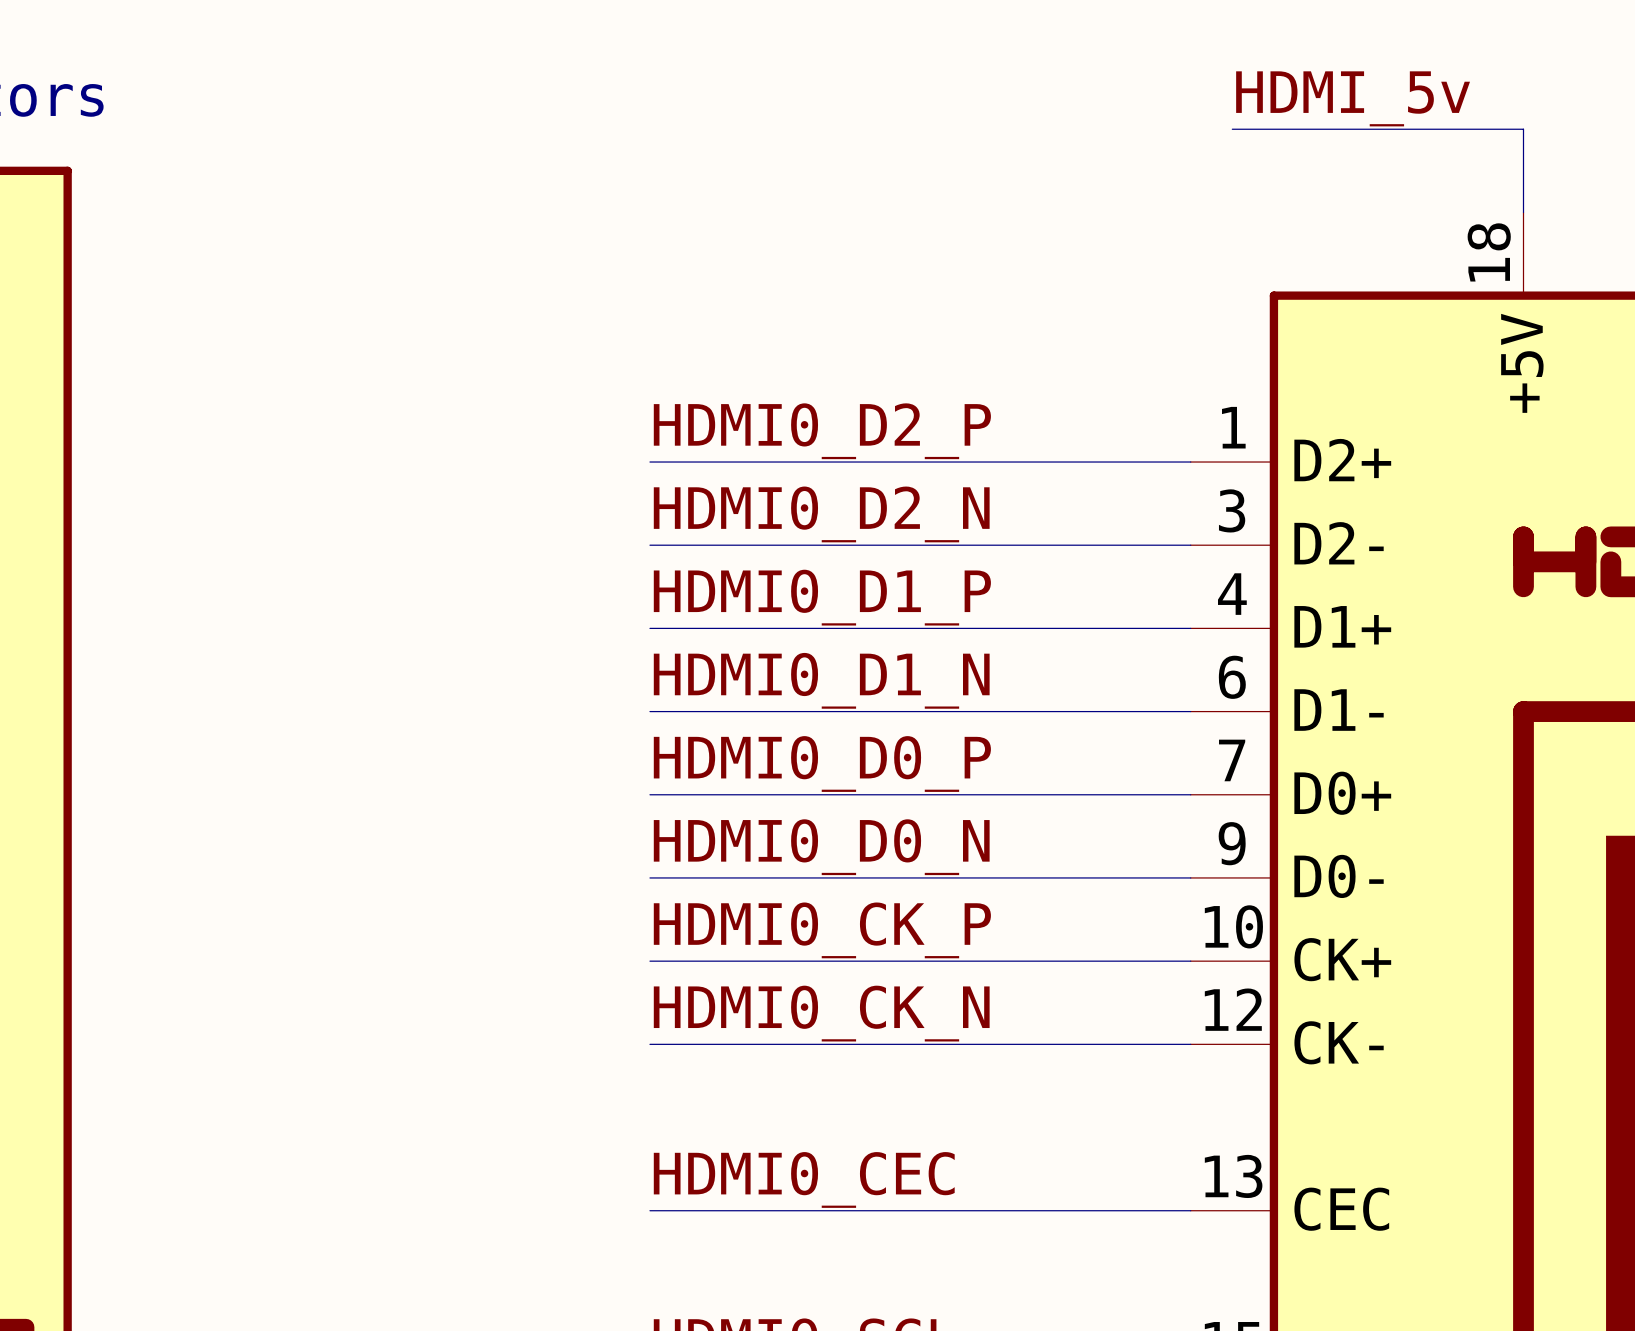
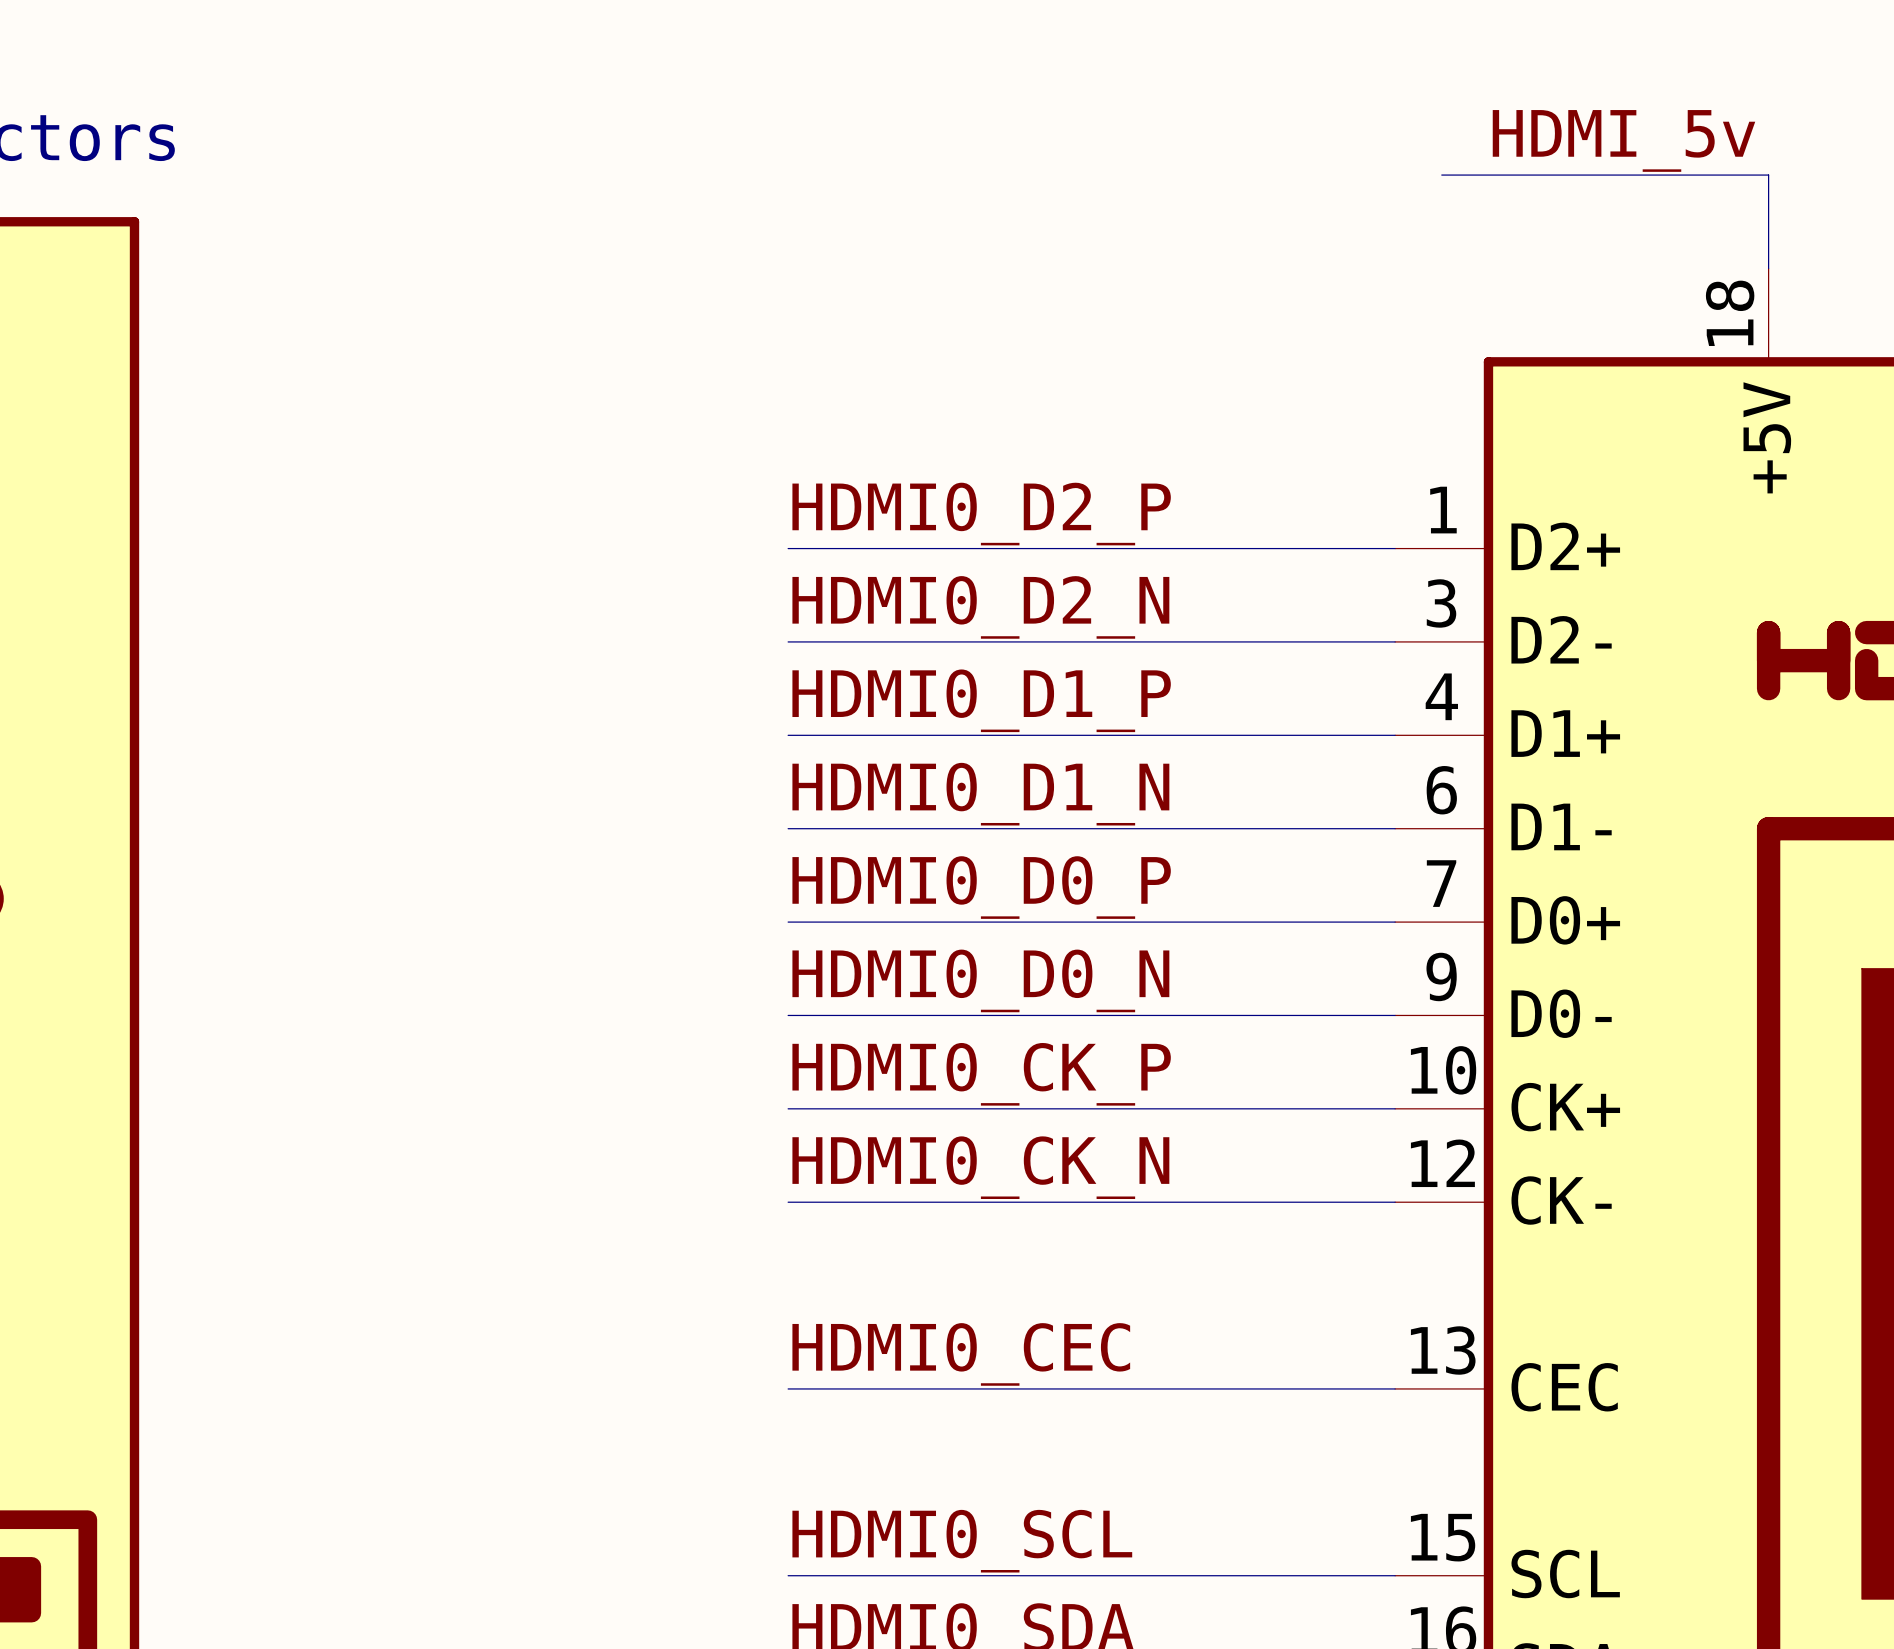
label position: HDMI_5v (1353, 98) -> HDMI_5v (1623, 140)

